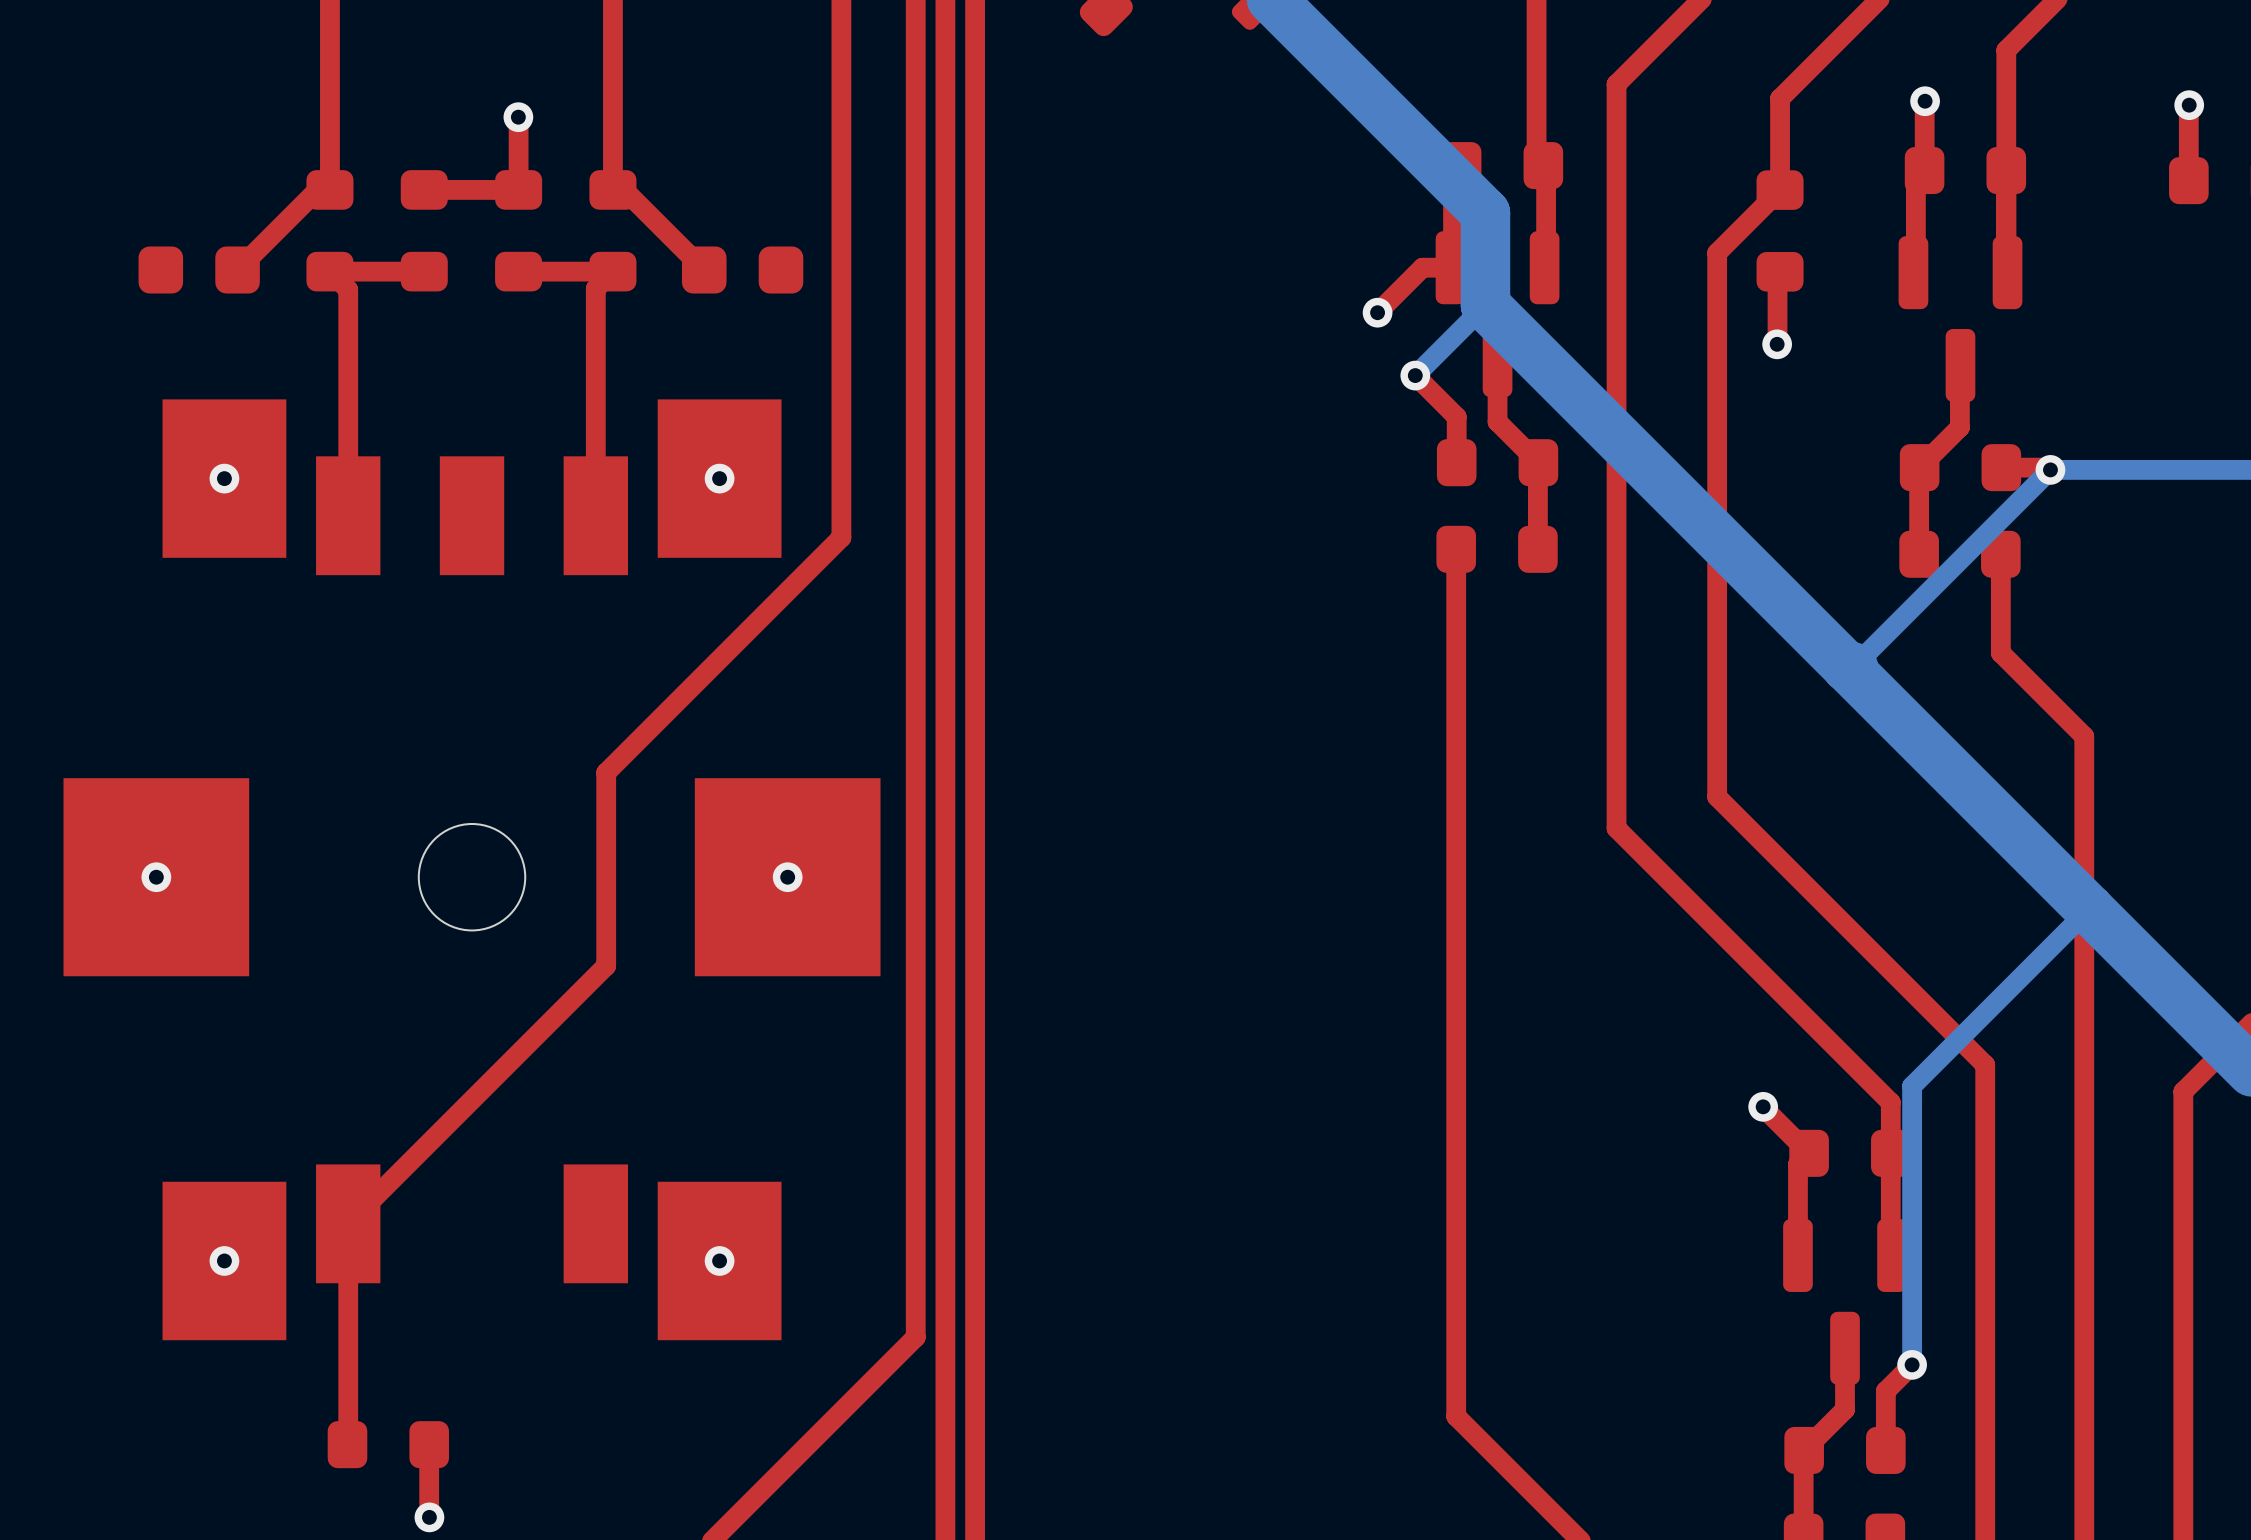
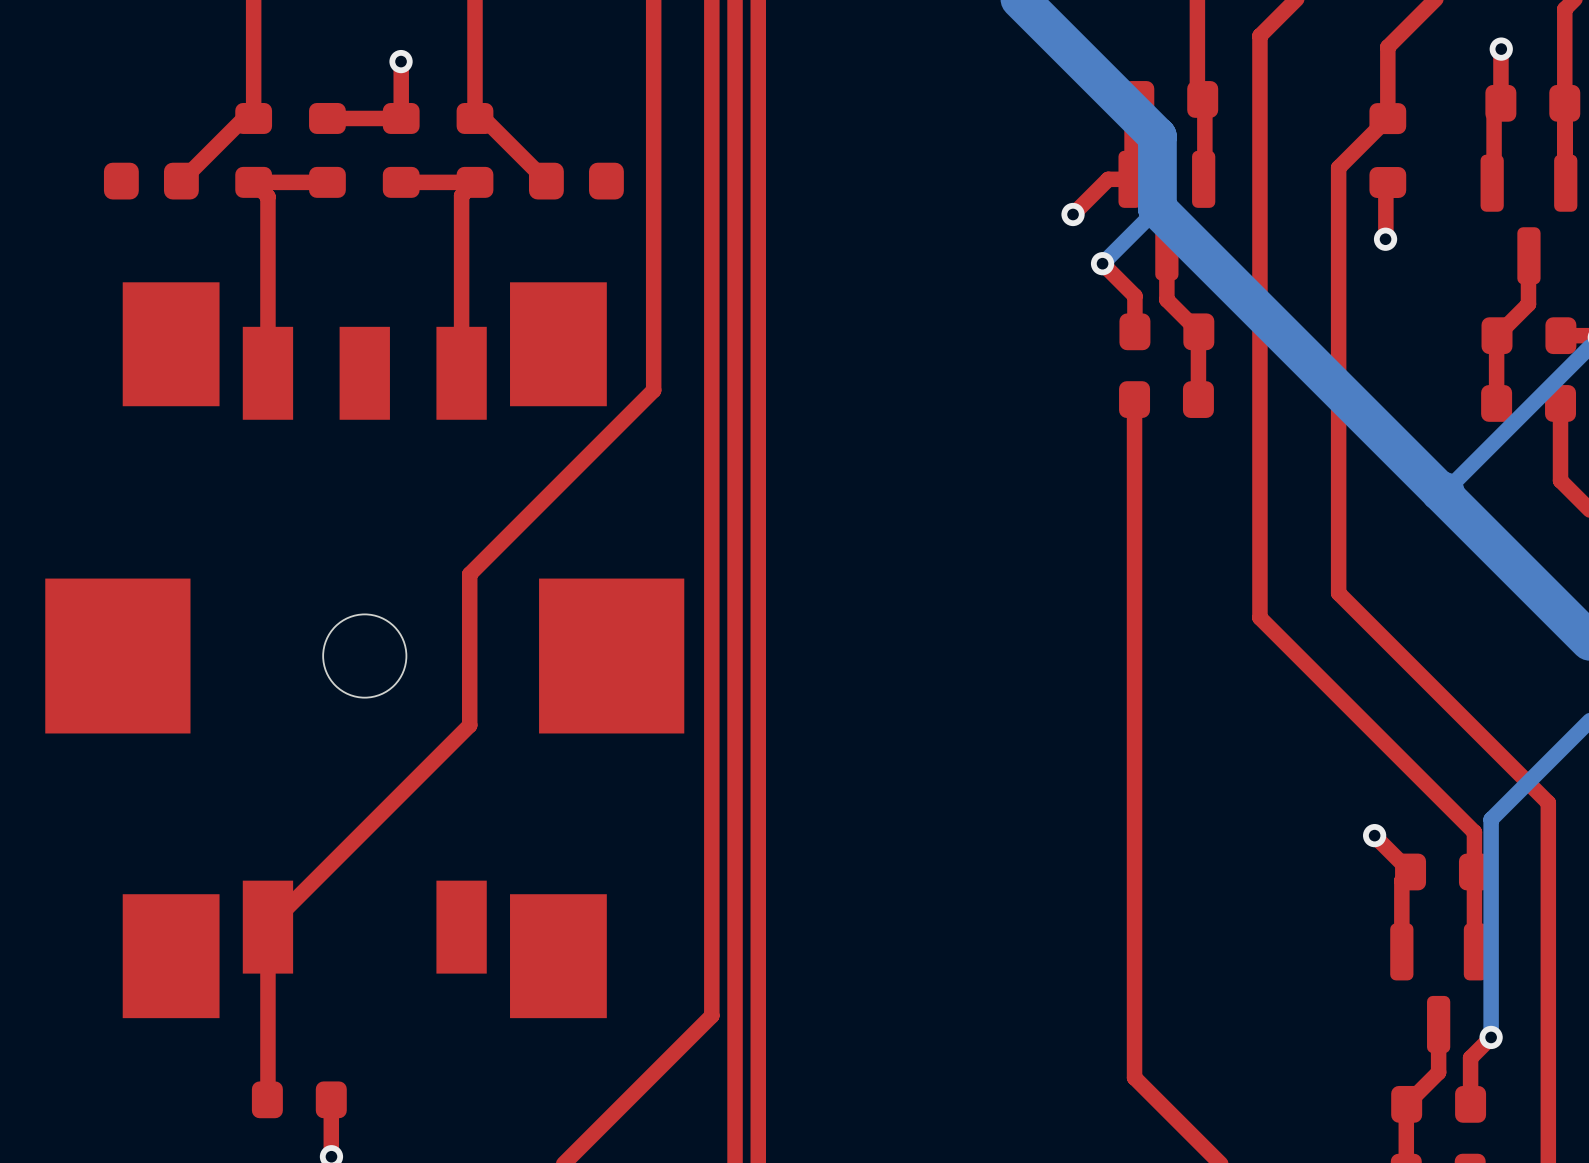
via: (224, 478) -> none
via: (719, 478) -> none
via: (156, 877) -> none
via: (787, 877) -> none
via: (224, 1260) -> none
via: (719, 1260) -> none

